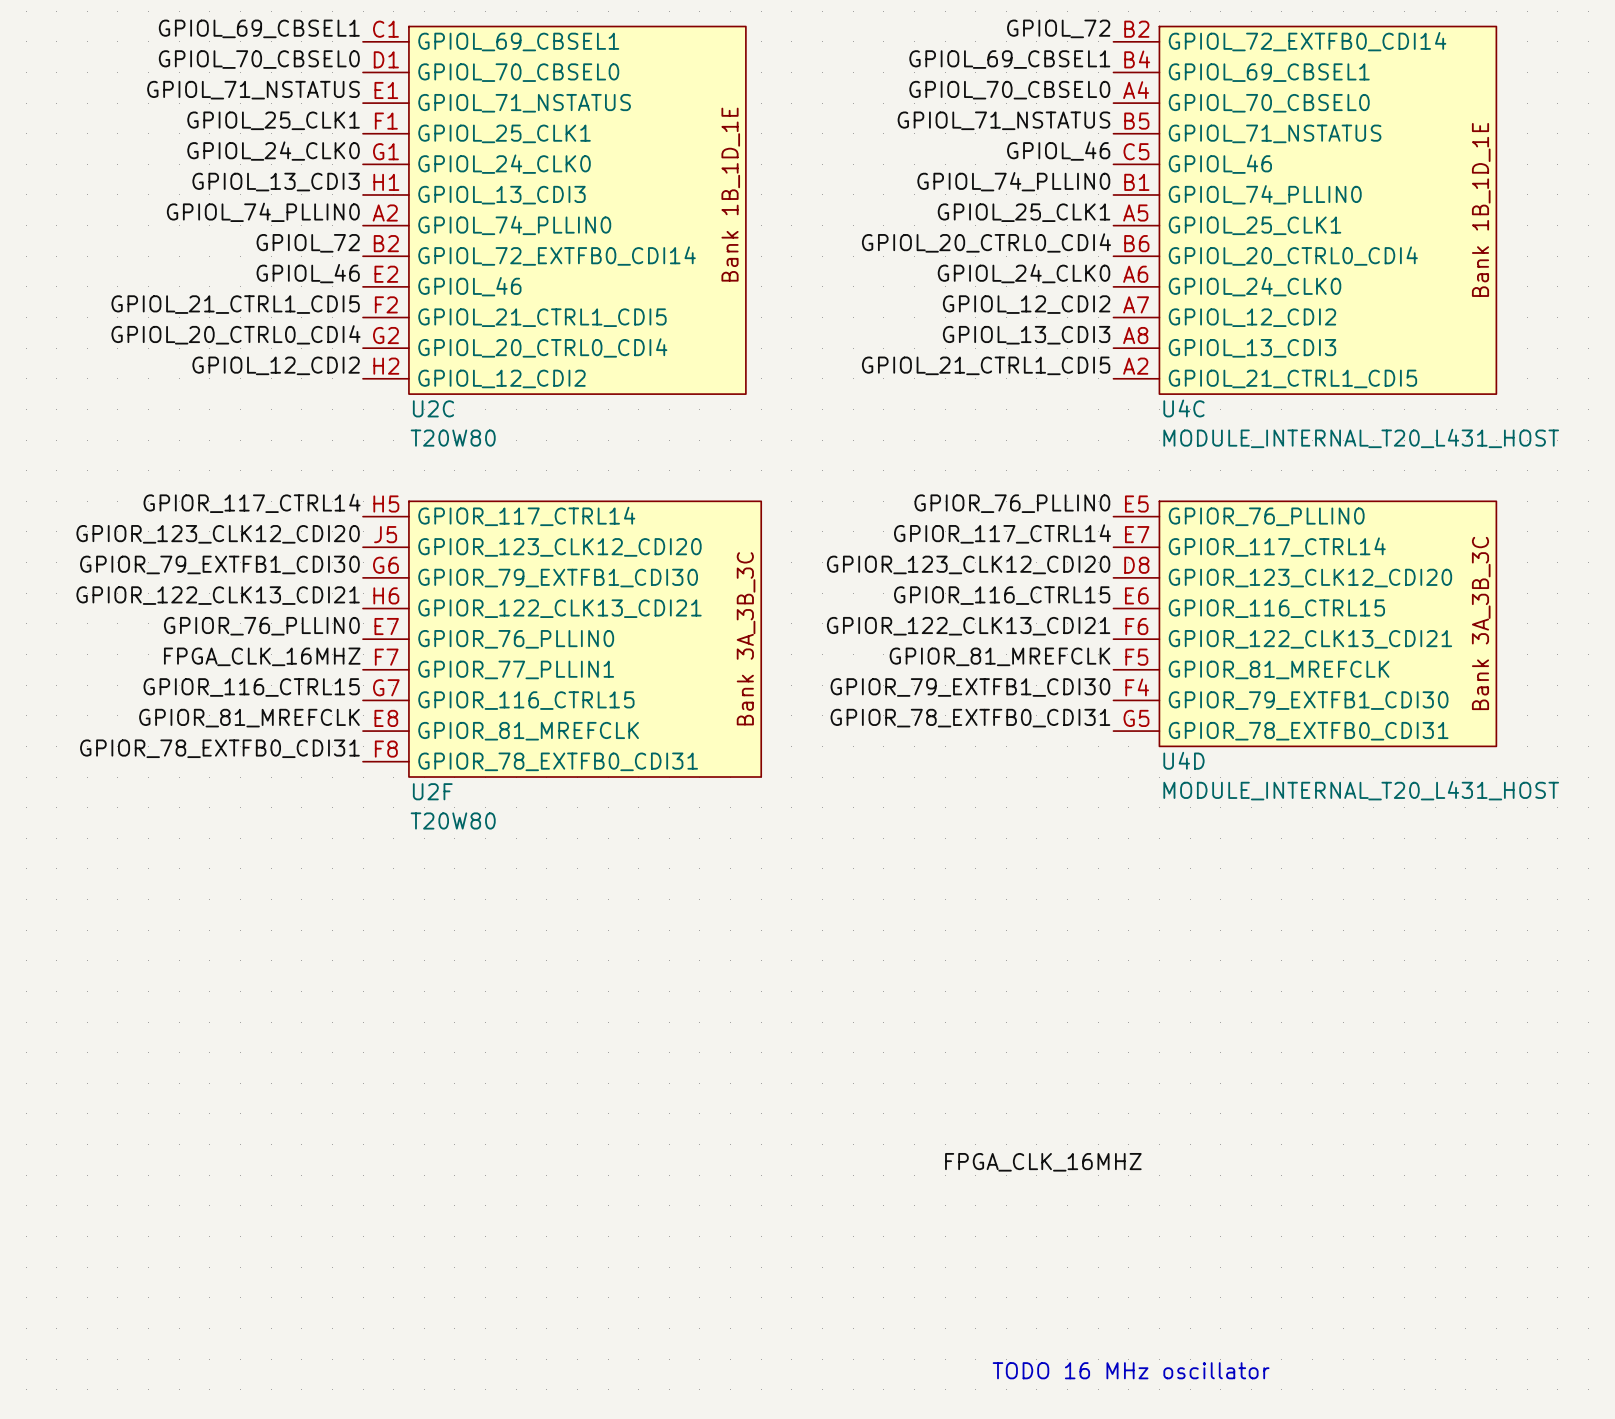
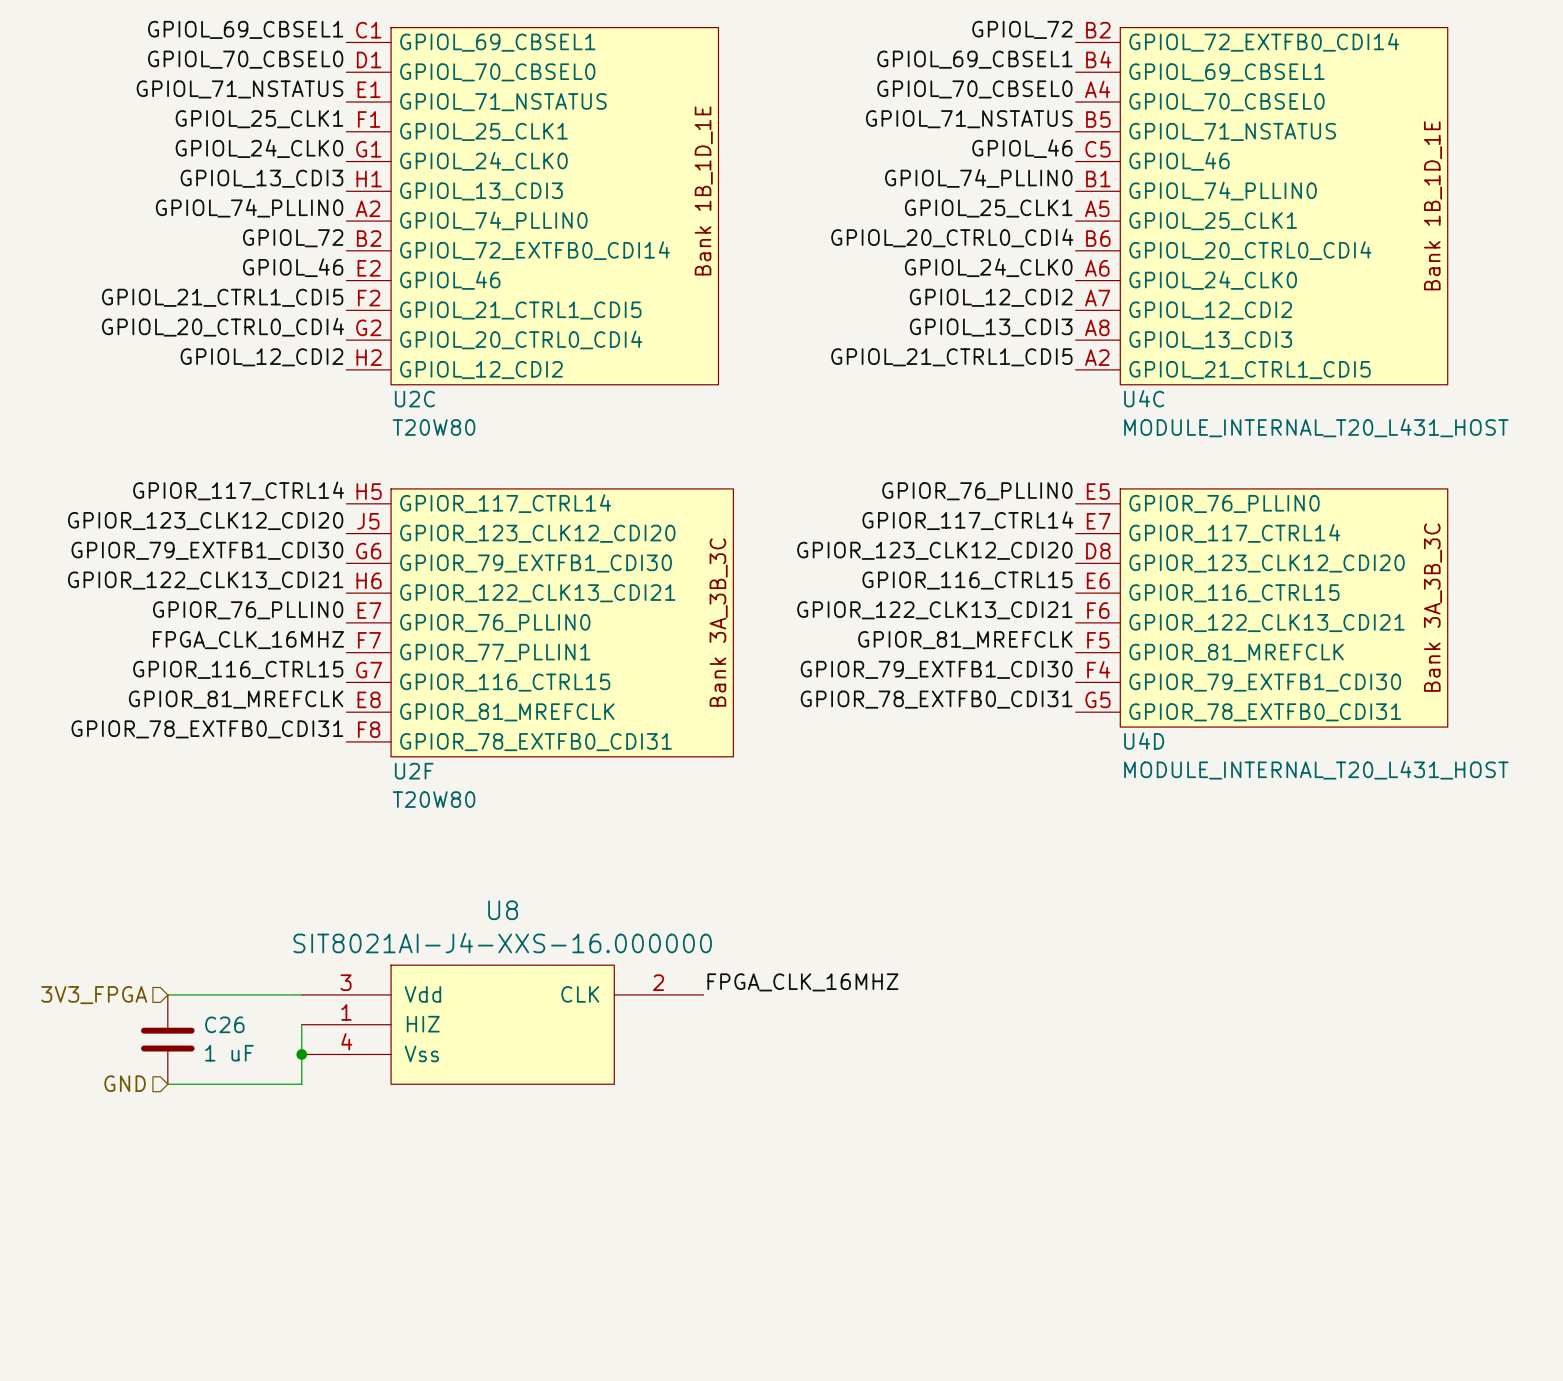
label: none -> FPGA_CLK_16MHZ (802, 982)
hierarchical label: none -> 3V3_FPGA (94, 995)
wire: none -> (167, 994) (301, 994)
wire: none -> (301, 1024) (301, 1084) (167, 1084)
U8: none -> SIT8021AI-J4-XXS-16.000000 (502, 1024)
C26: none -> 1 uF (167, 1039)
junction: none -> (301, 1054)
hierarchical label: none -> GND (125, 1083)
label: FPGA_CLK_16MHZ (1043, 1162) -> none
text: TODO 16 MHz oscillator (1131, 1370) -> none

